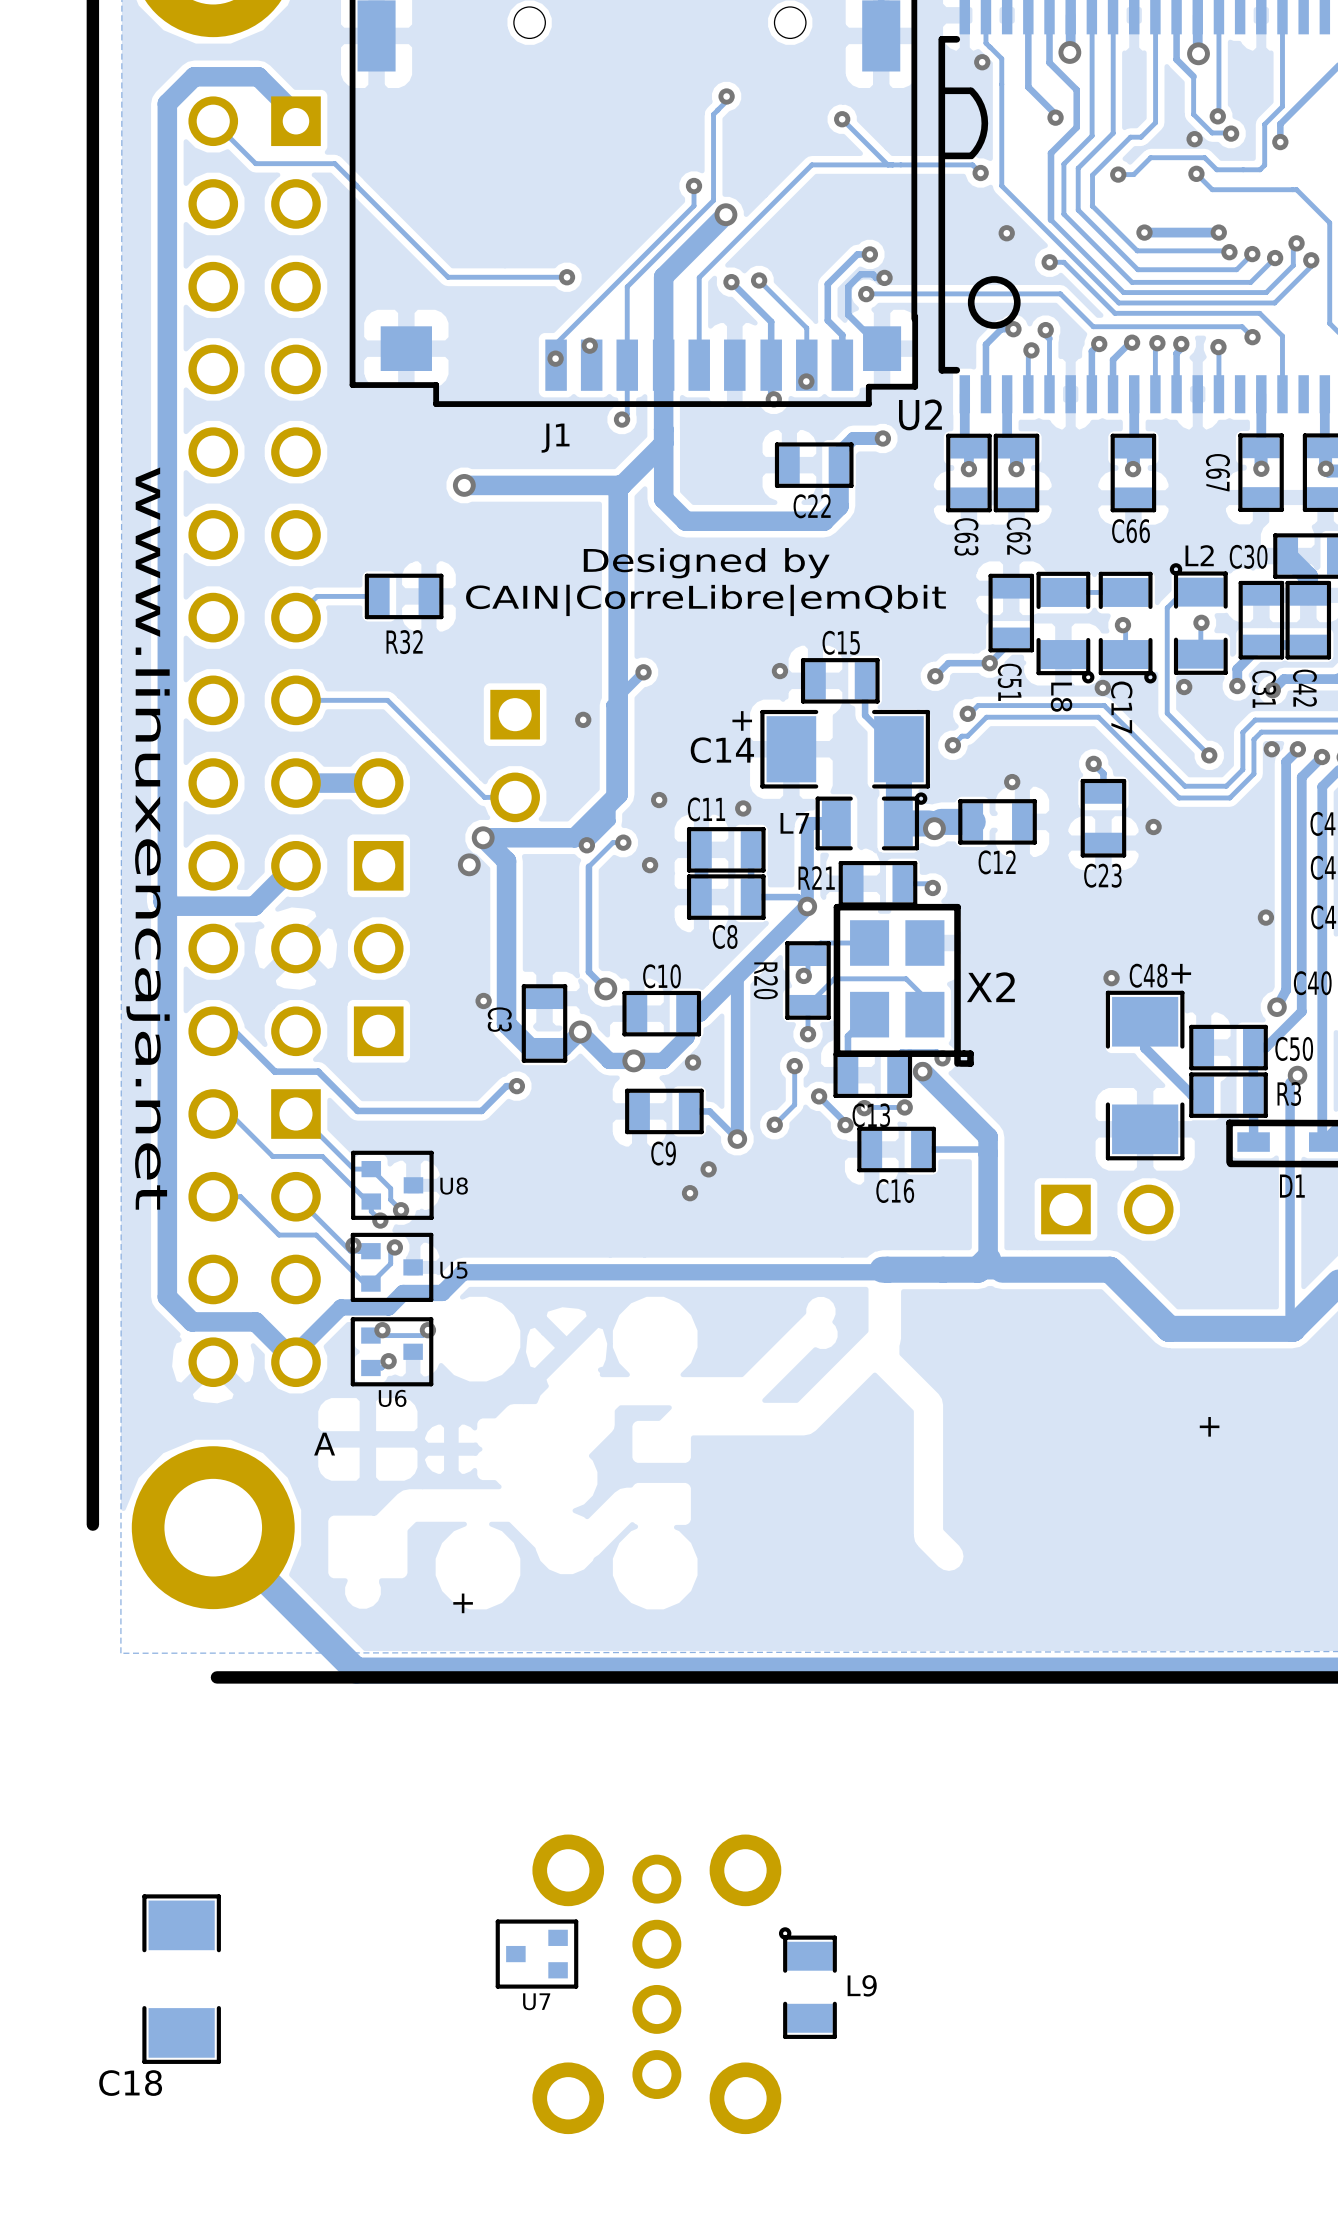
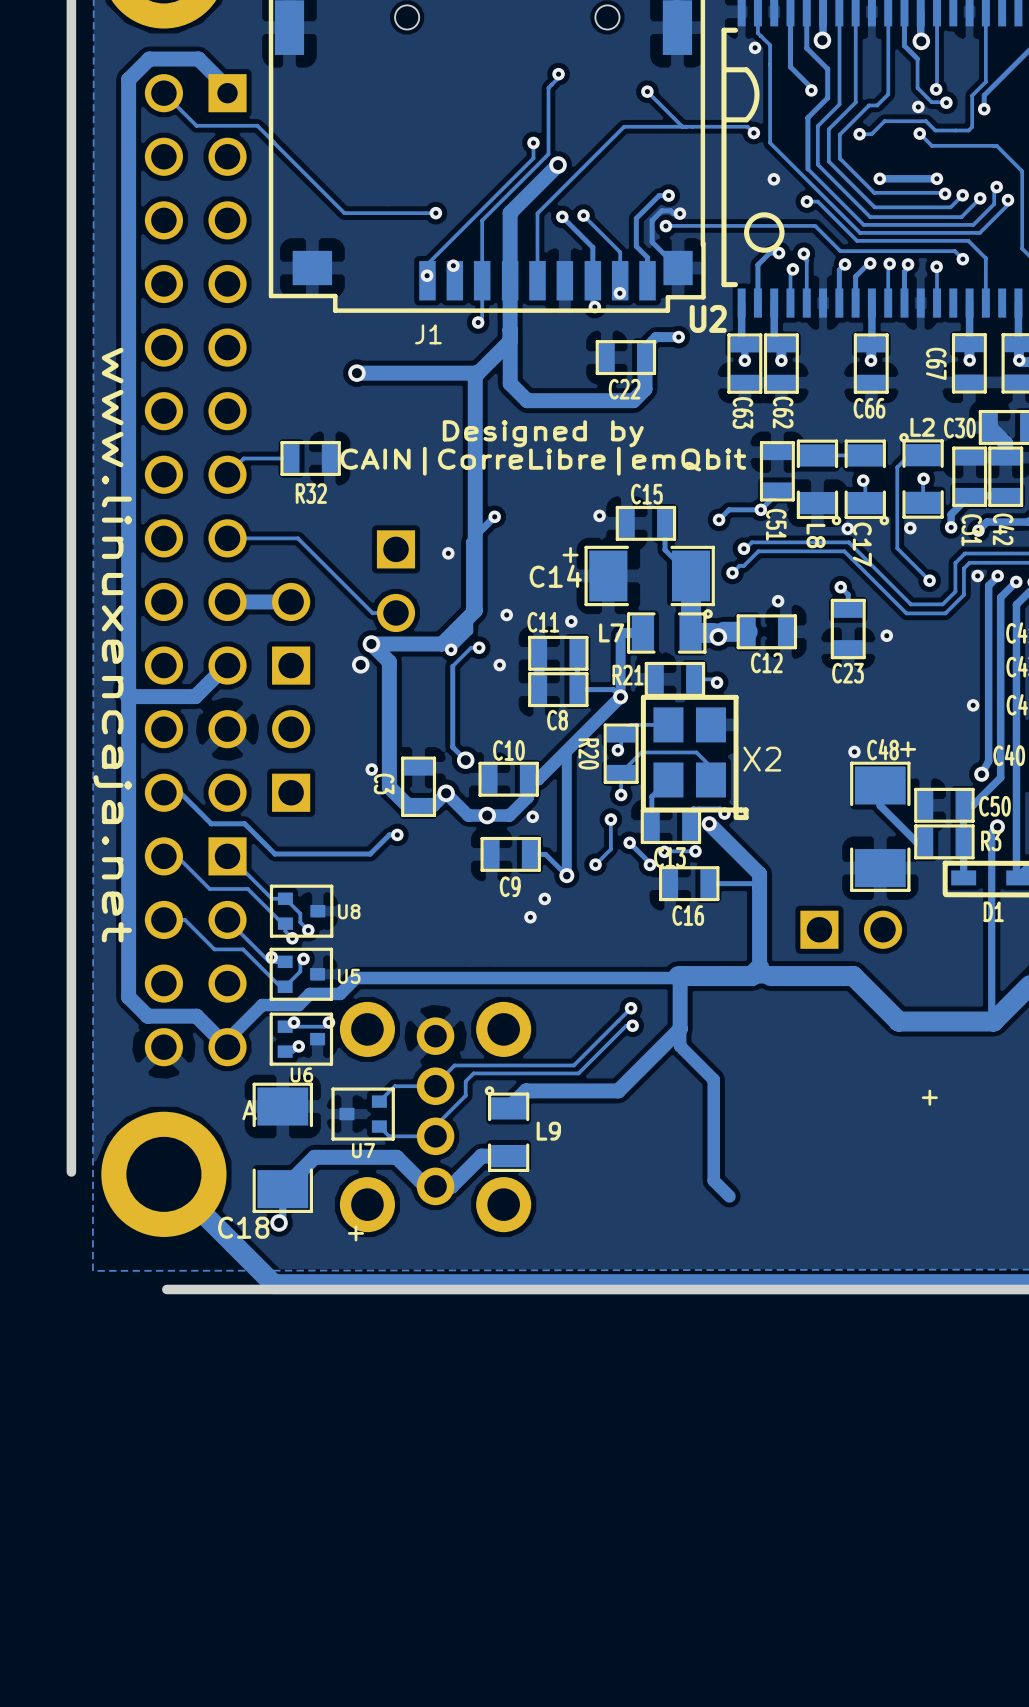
track: none -> (680, 978) (680, 1029) (618, 1090) (526, 1090) (508, 1108)
track: none -> (631, 1008) (573, 1065) (454, 1065) (435, 1086) (394, 1086) (379, 1101)
via: none -> (631, 1008)
track: none -> (632, 1025) (626, 1025) (578, 1073) (473, 1073) (465, 1081) (465, 1095) (435, 1125) (435, 1136) (389, 1136) (379, 1126)
via: none -> (632, 1025)
track: none -> (680, 1028) (680, 1046) (713, 1079) (713, 1180) (729, 1196)
track: none -> (508, 1156) (481, 1156) (451, 1186) (425, 1186) (396, 1157) (314, 1157) (282, 1189) (282, 1219) (279, 1222)
via: none -> (279, 1222)
U7 position: (536, 1954) -> (363, 1114)
C18 position: (181, 1979) -> (282, 1147)
L9 position: (807, 1983) -> (507, 1129)
part position: (656, 1984) -> (435, 1117)

